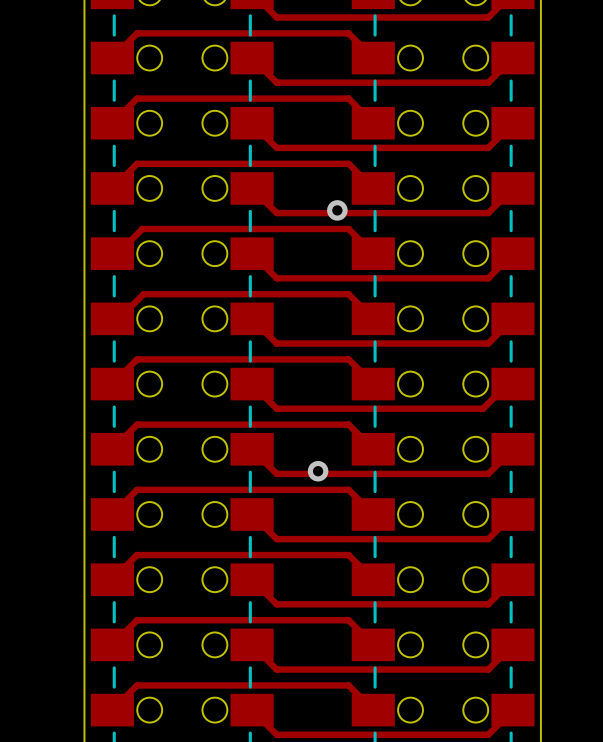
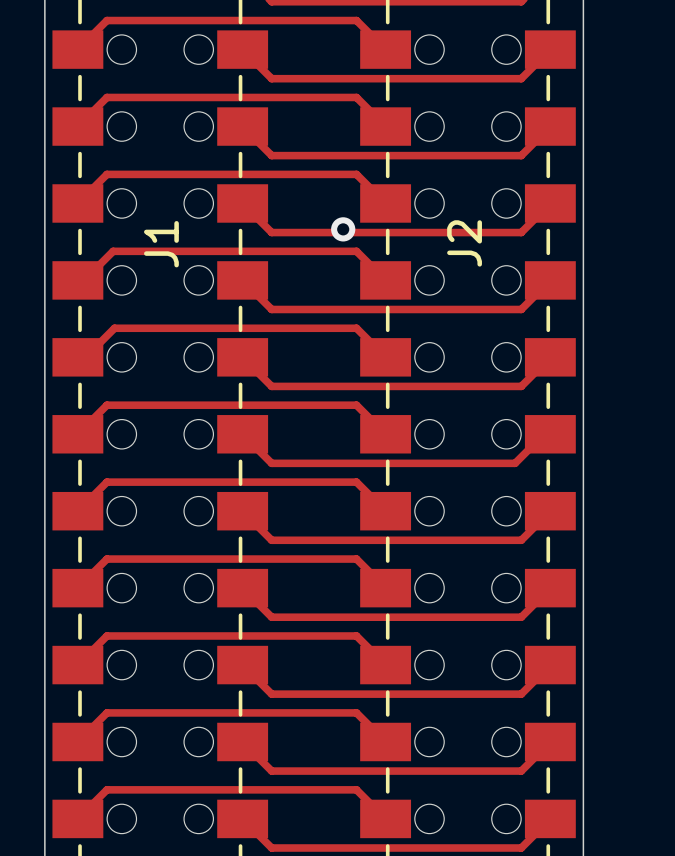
J1 name: none -> J1 (161, 244)
J2 name: none -> J2 (464, 243)
via: (318, 471) -> none

